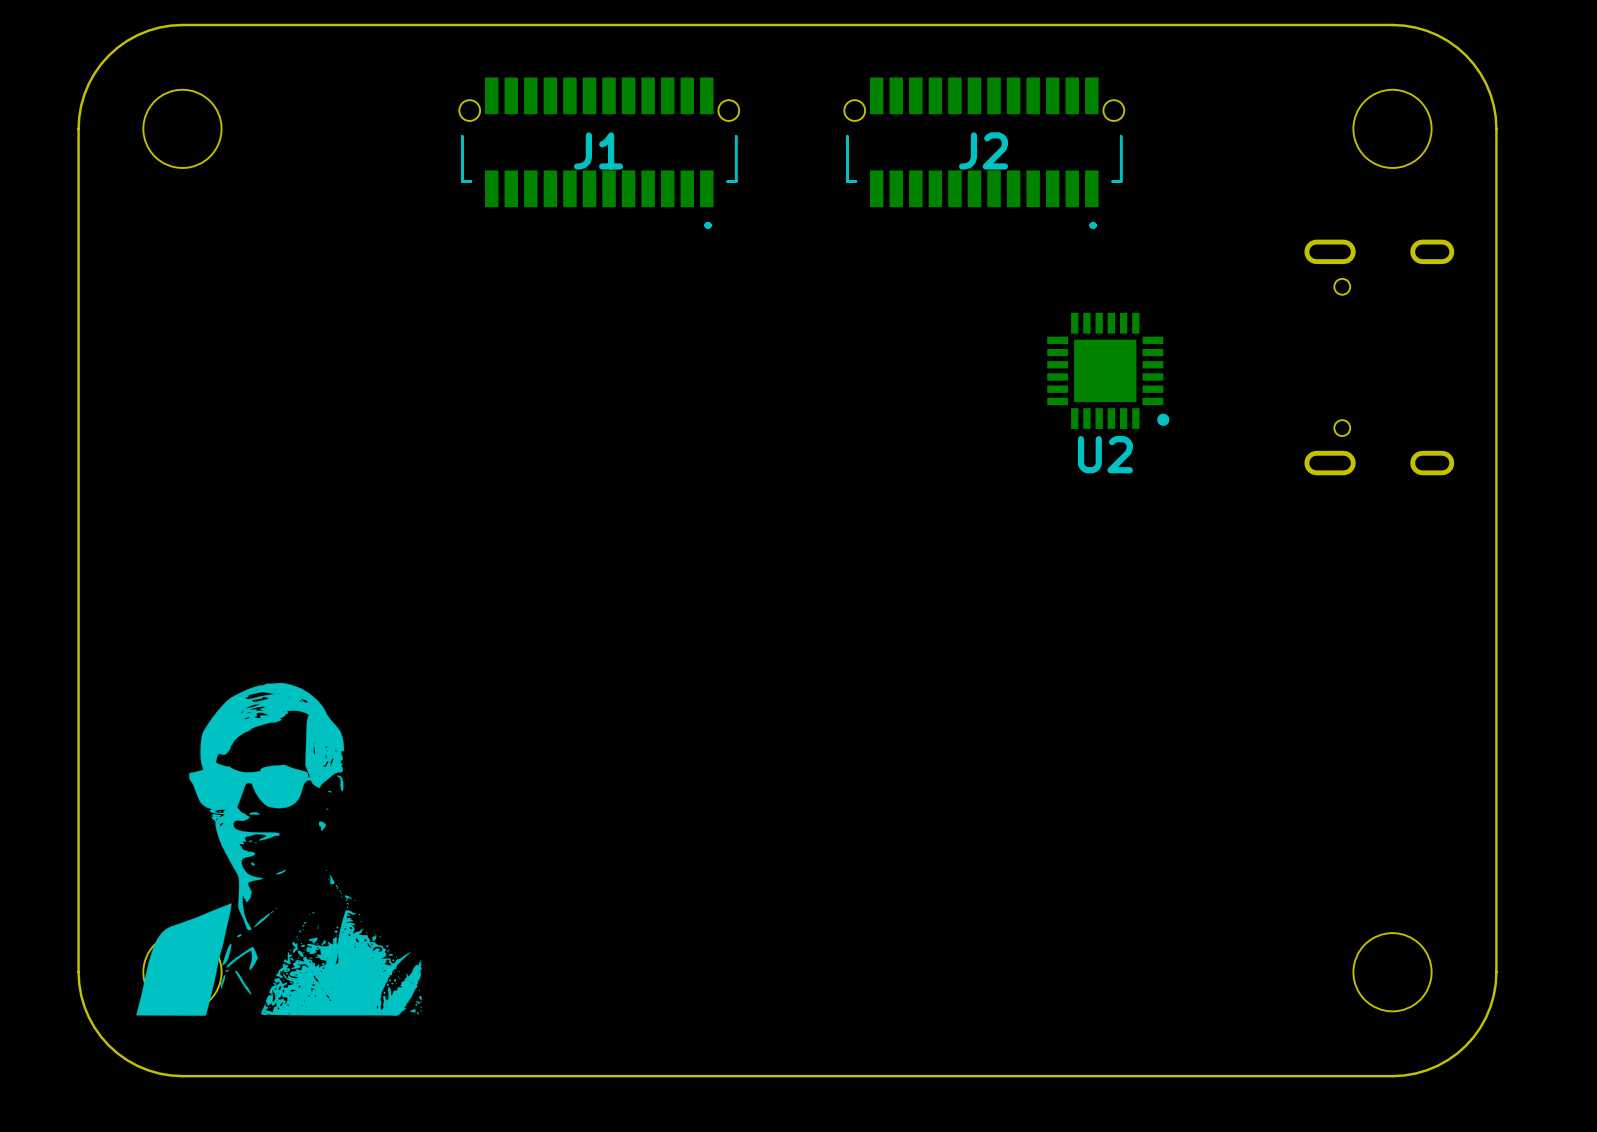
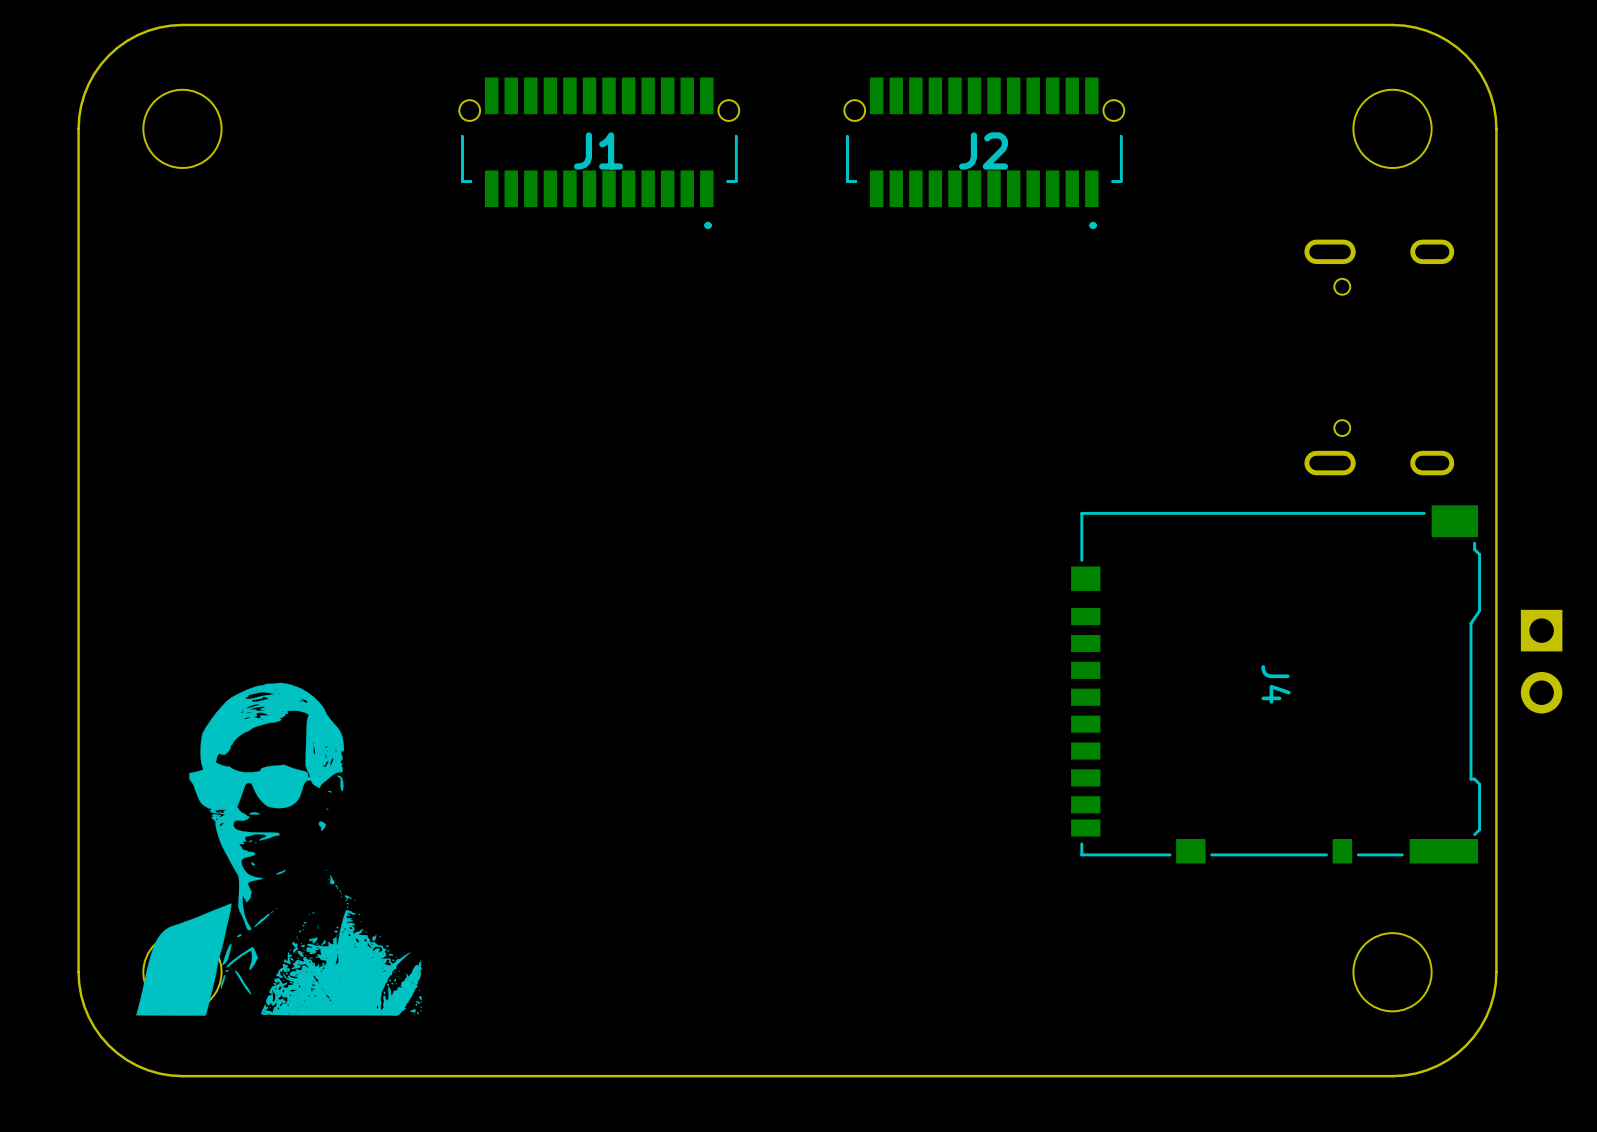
U2: (1108, 370) -> none
part: none -> (1541, 661)
J4: none -> (1276, 684)

